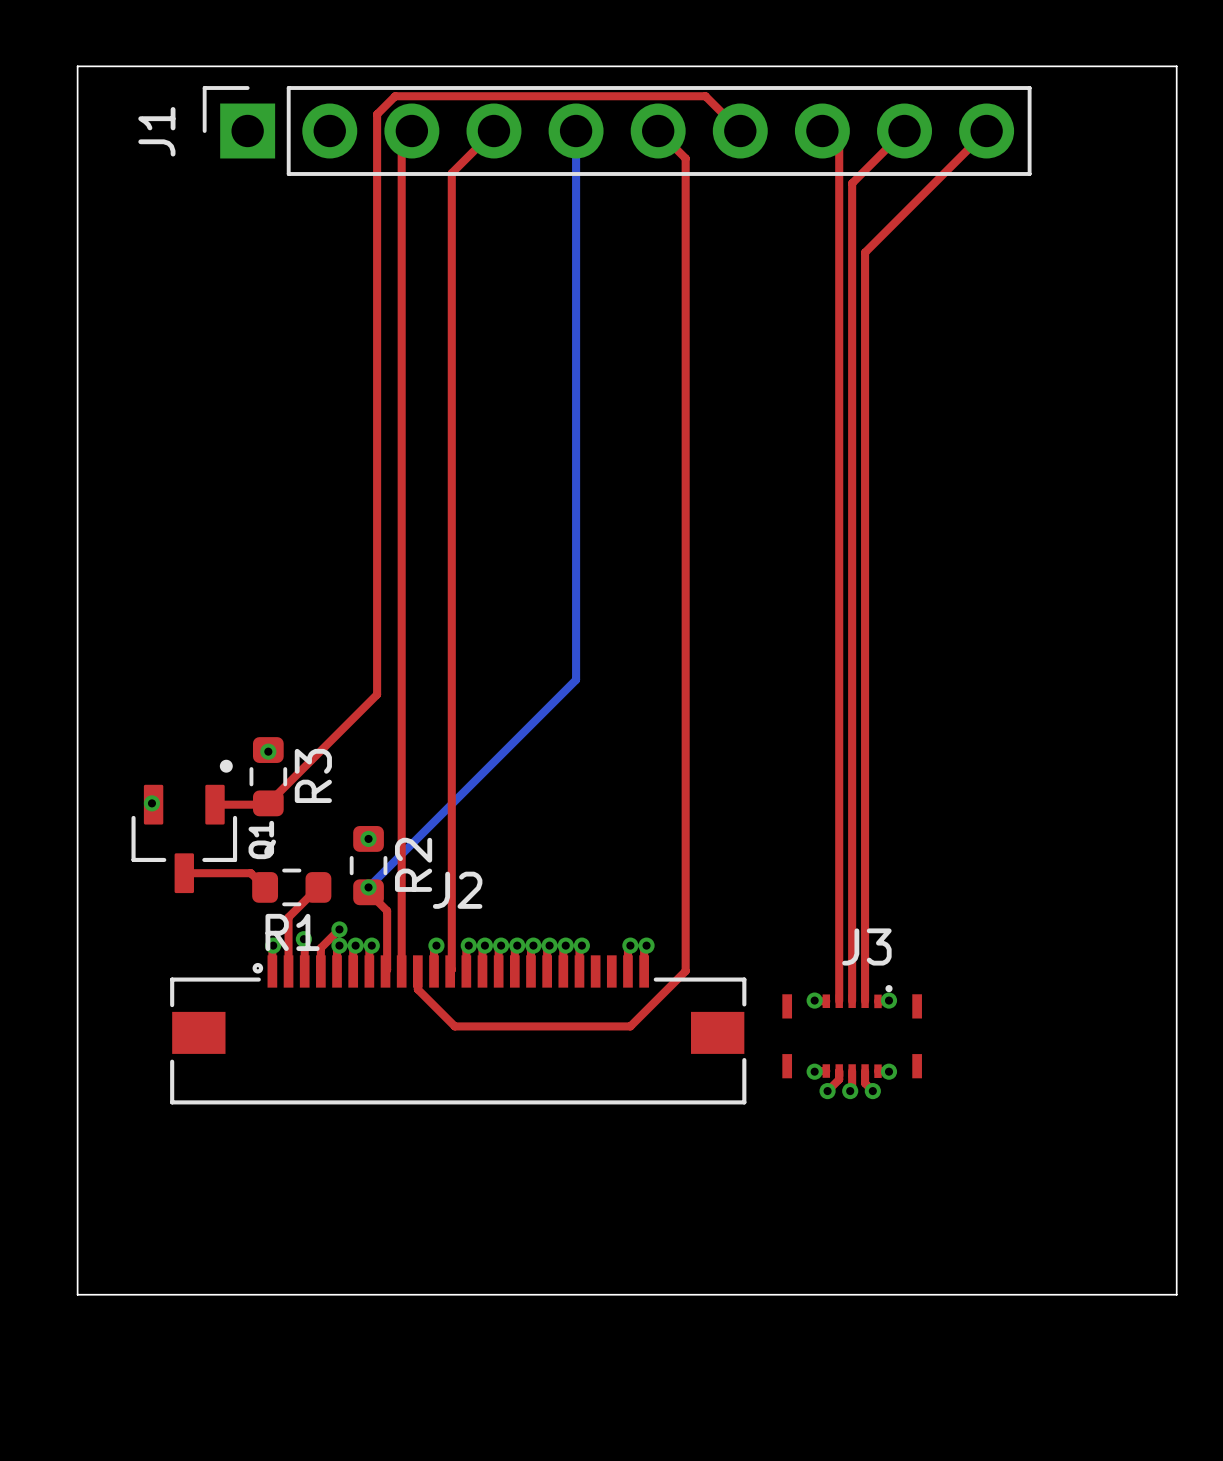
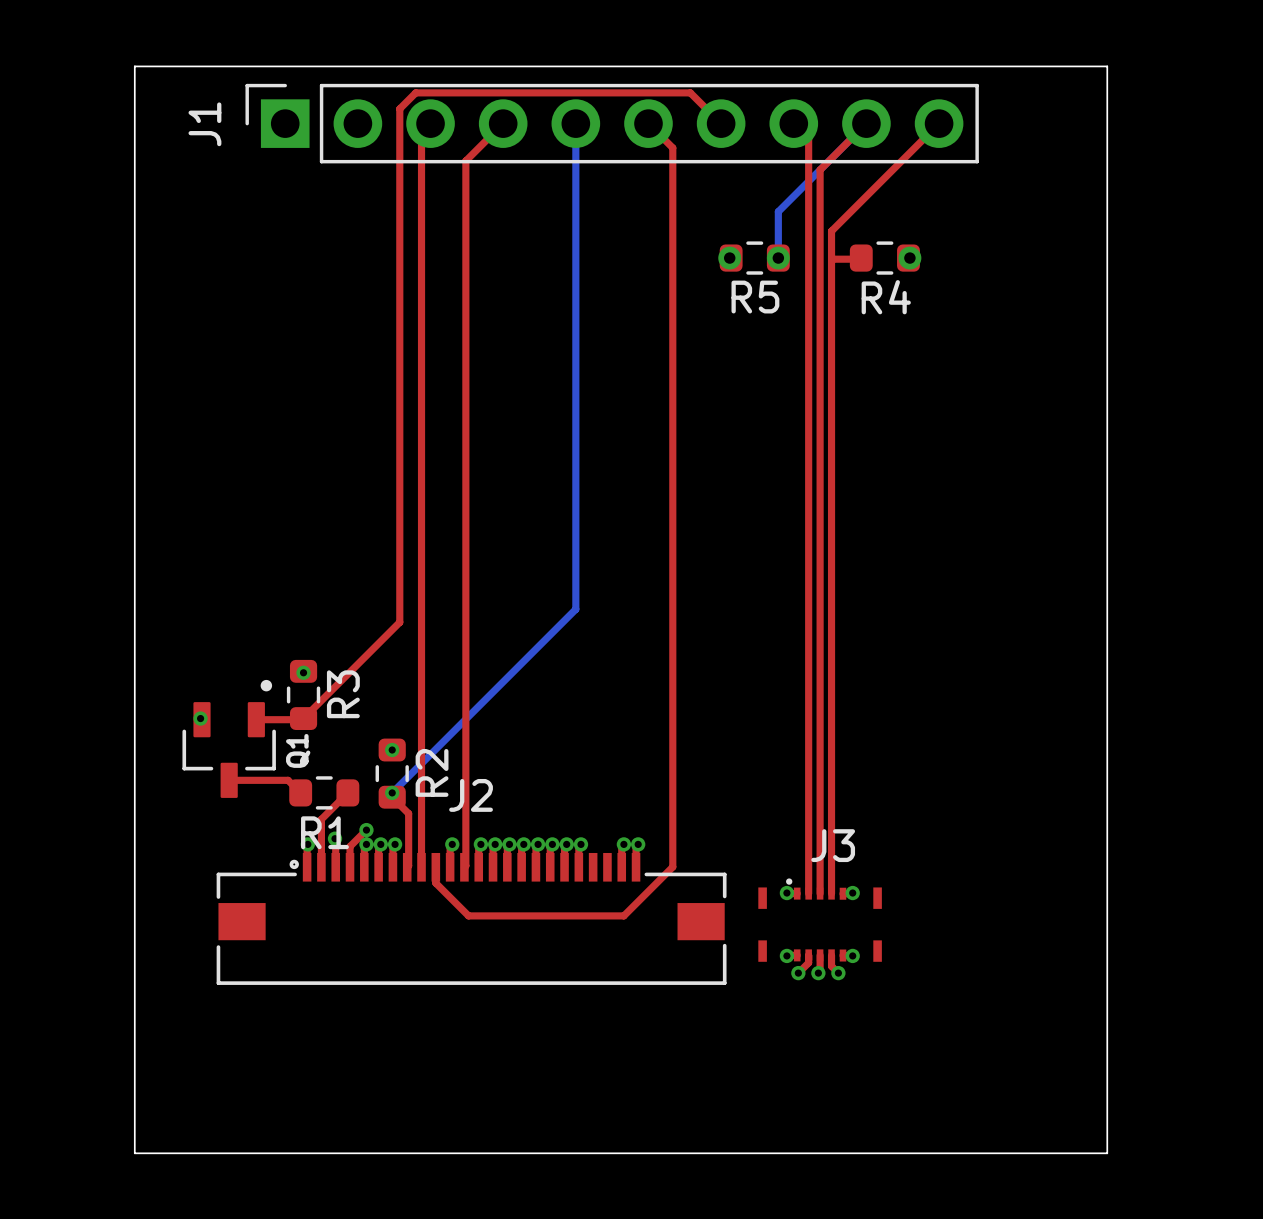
bottom track: none -> (866, 123) (778, 211) (778, 258)
via: none -> (729, 258)
R5: none -> (754, 258)
via: none -> (778, 258)
top track: none -> (861, 258) (831, 259)
R4: none -> (884, 258)
via: none -> (909, 258)
J3 footprint: [782, 985, 922, 1079] -> [758, 878, 882, 962]

